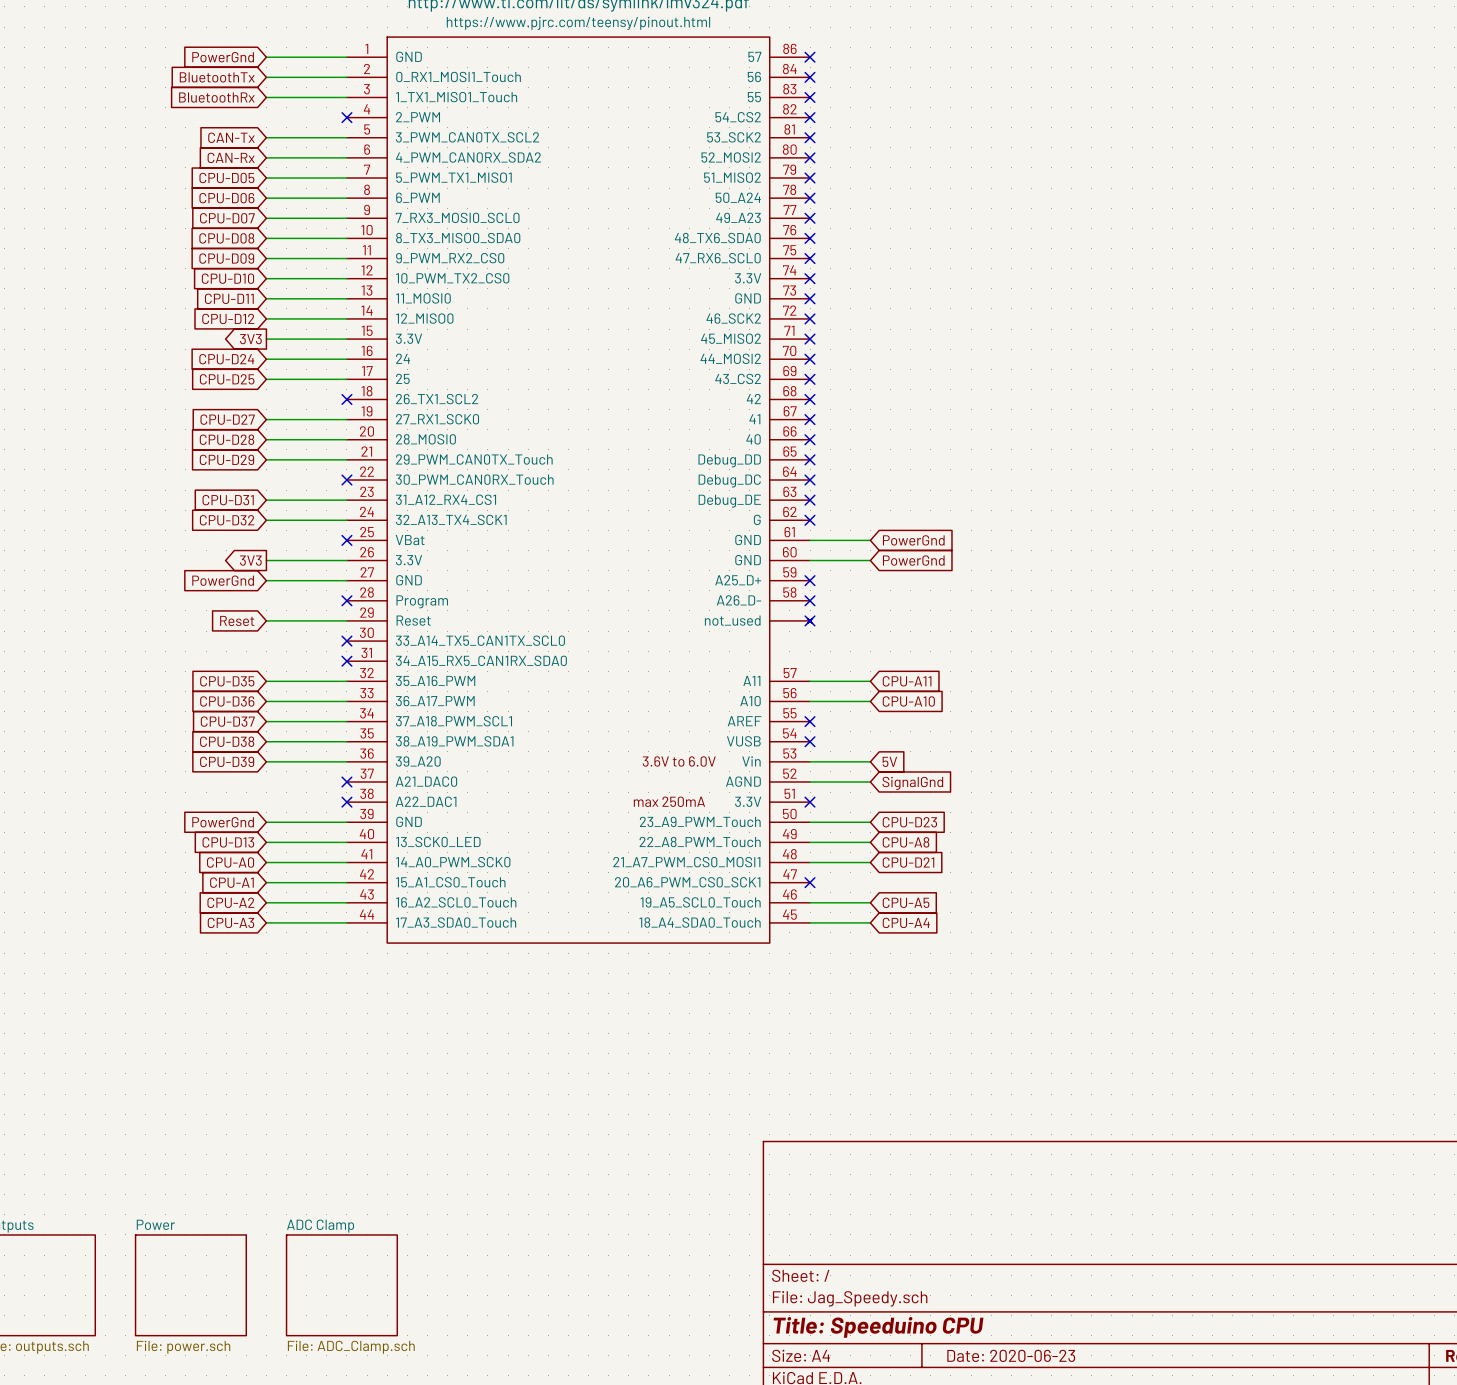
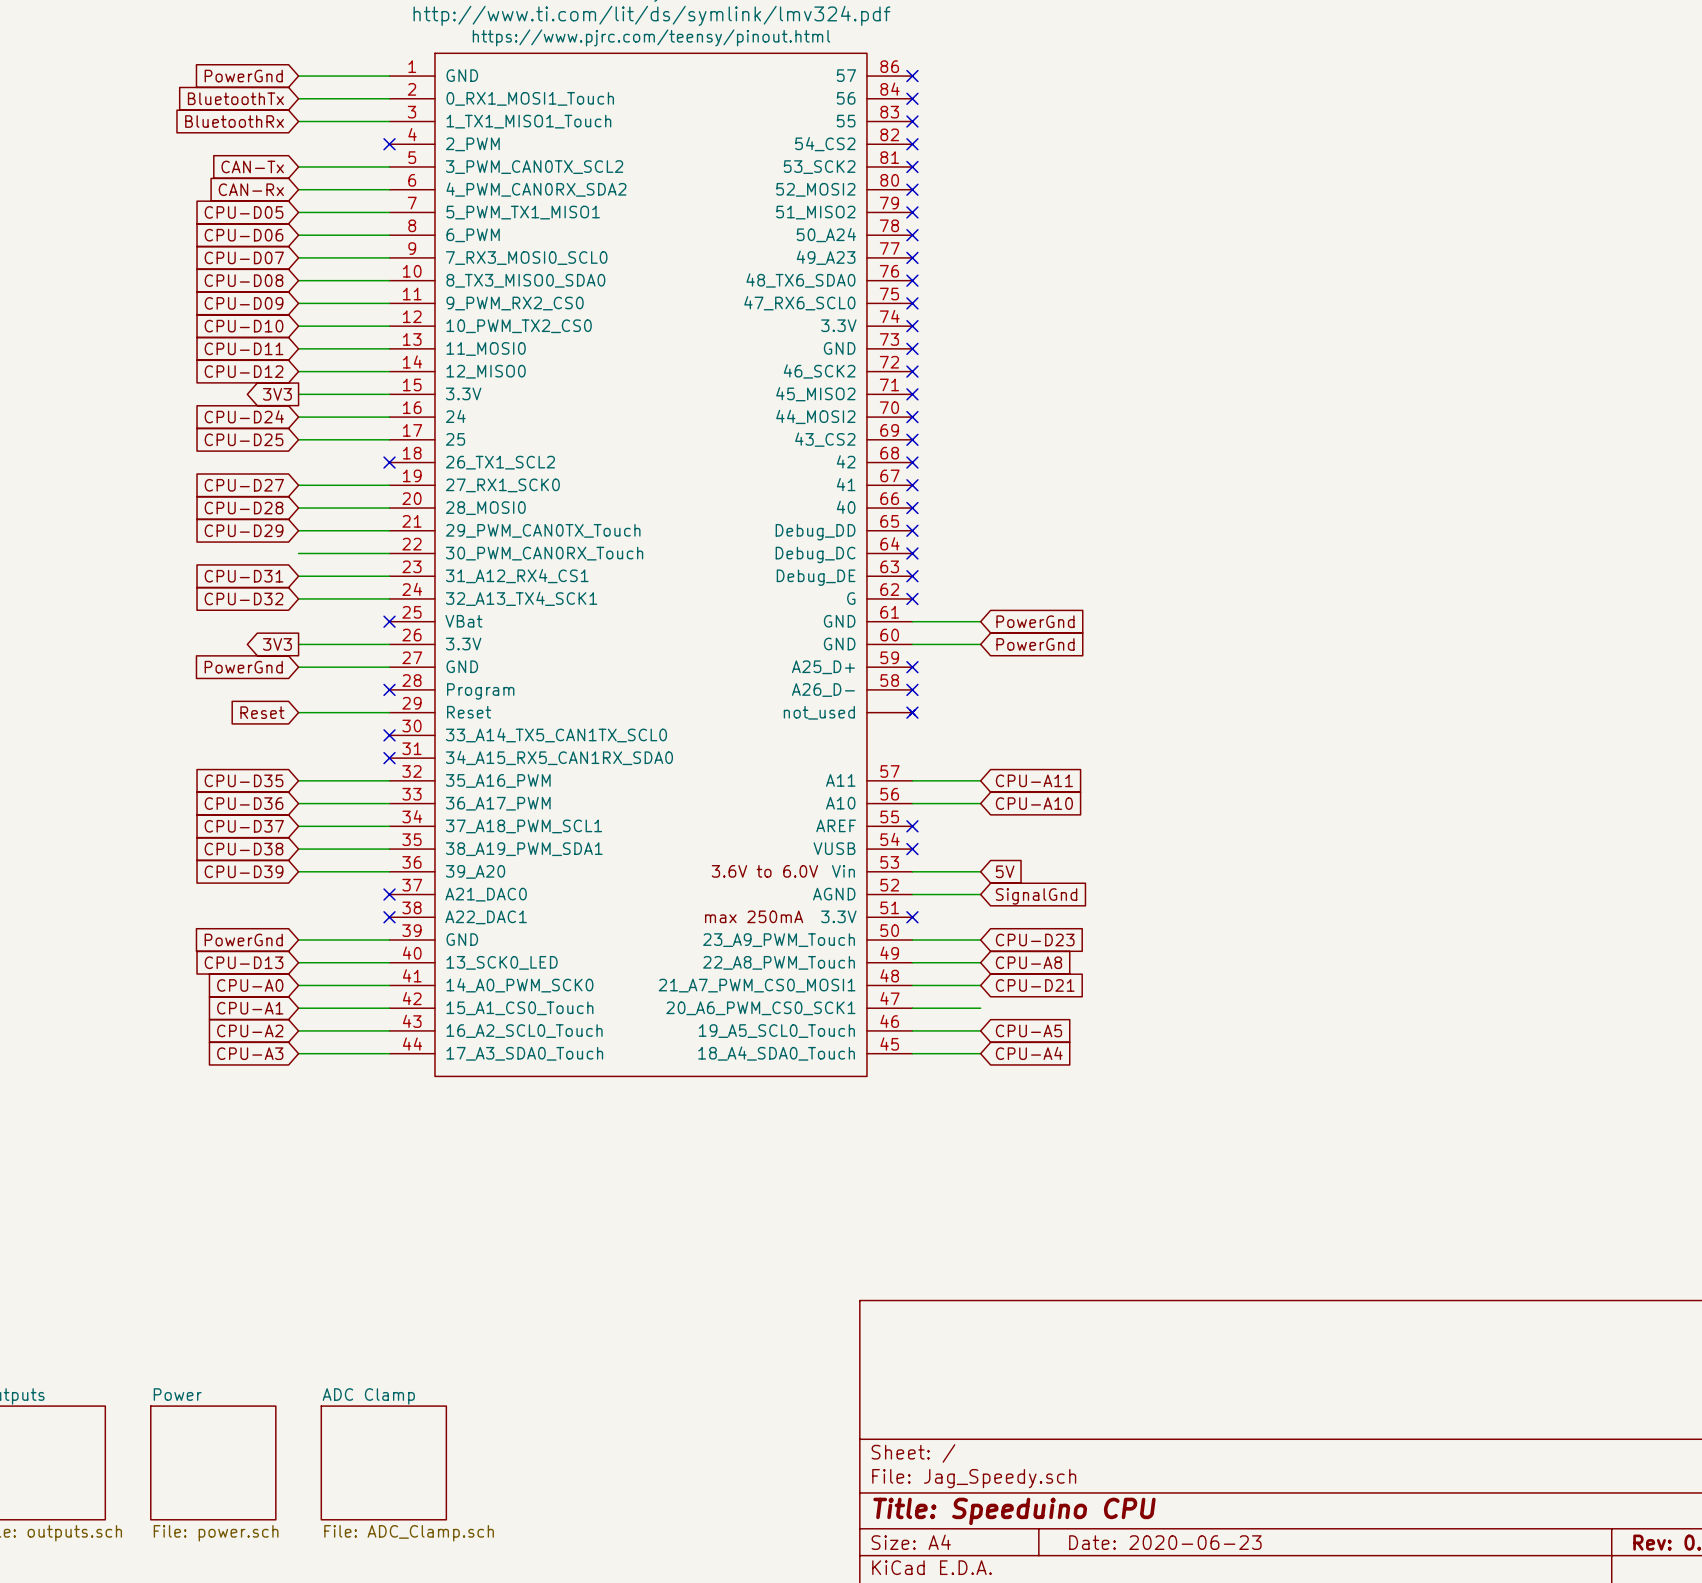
wire: none -> (298, 553) (389, 553)
no-connect mark: (346, 480) -> none
wire: none -> (912, 1008) (980, 1008)
no-connect mark: (810, 882) -> none

